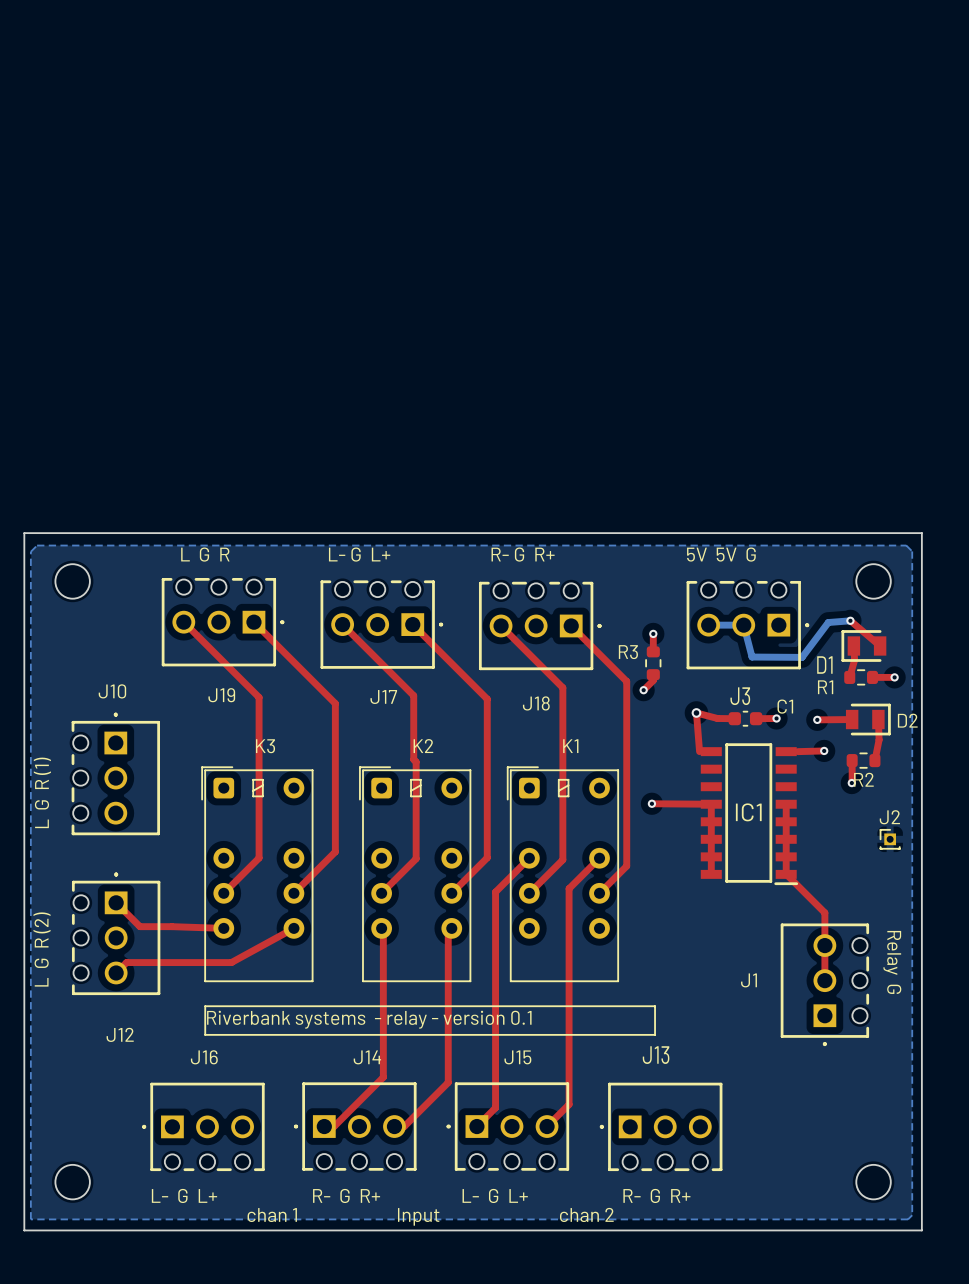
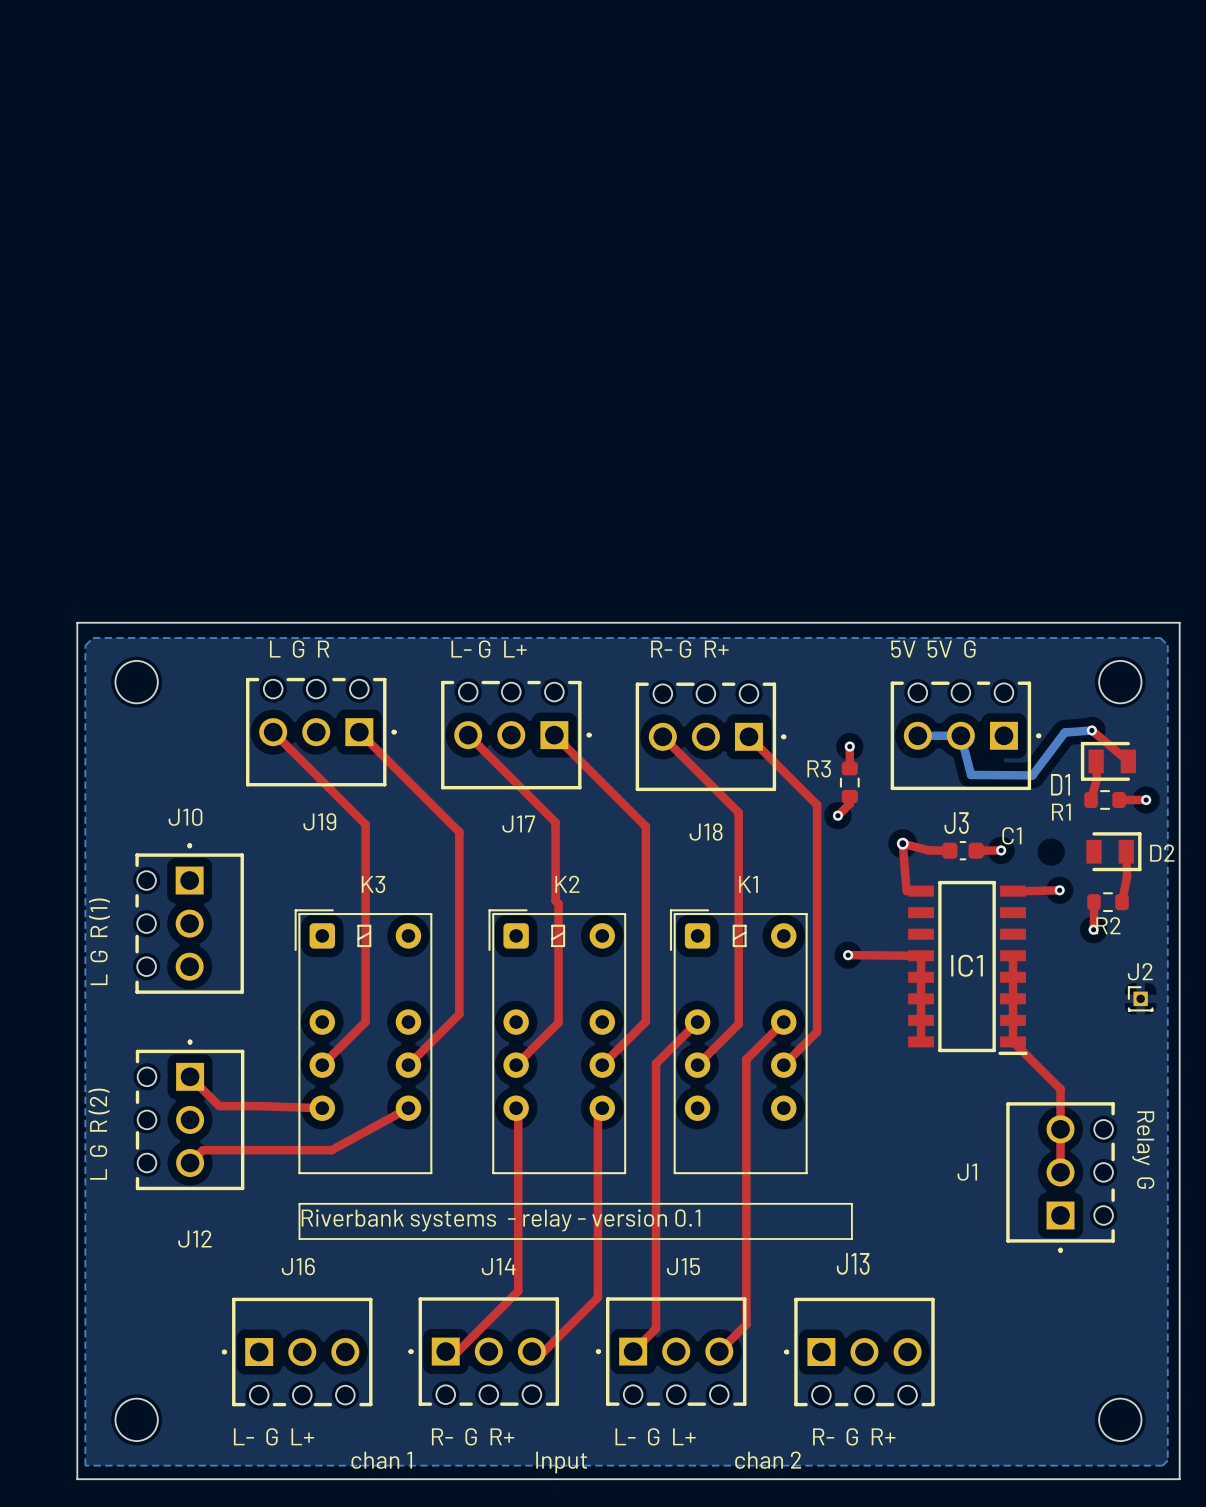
via: (817, 719) -> none
top track: (852, 719) (817, 719) -> none

